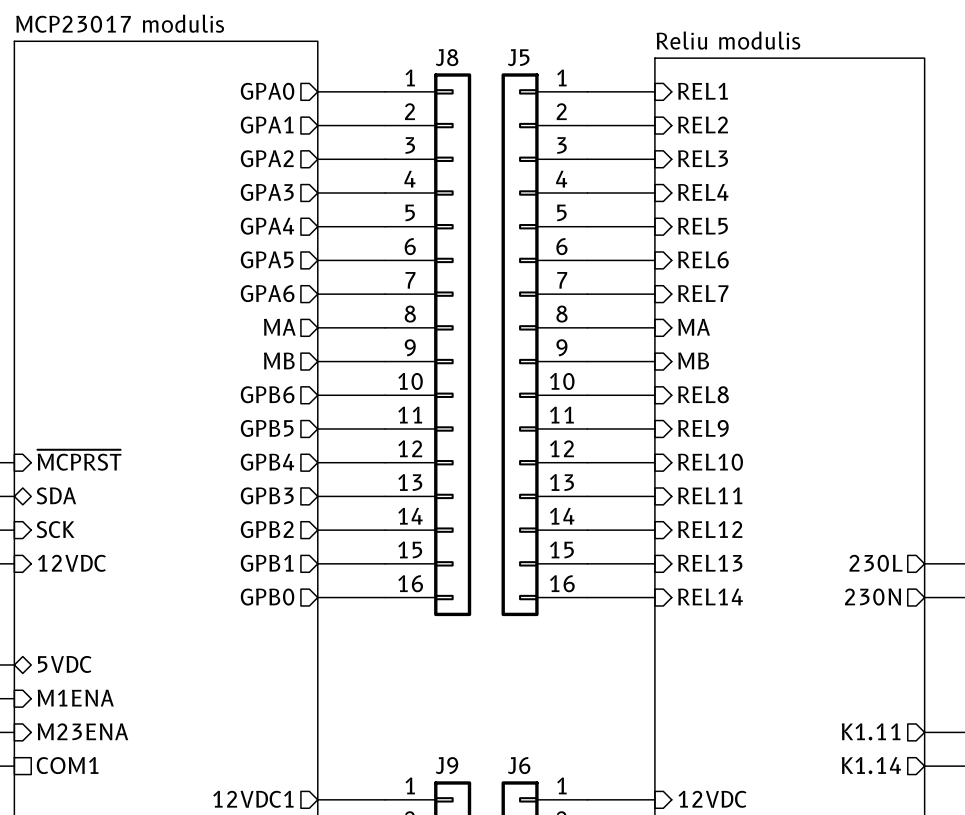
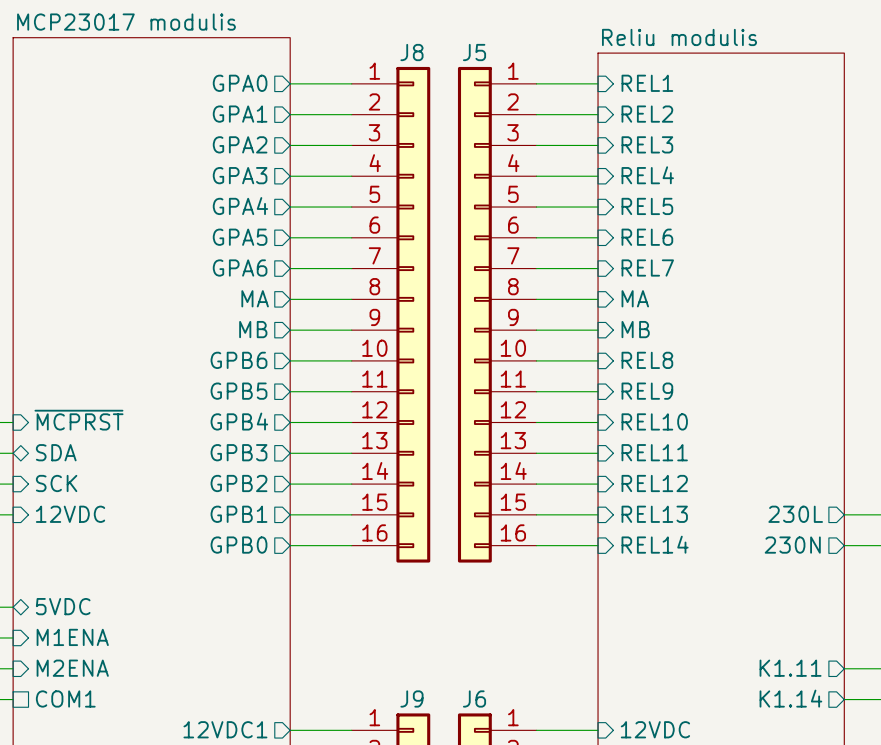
sheet pin: M23ENA (82, 731) -> M2ENA (72, 668)

